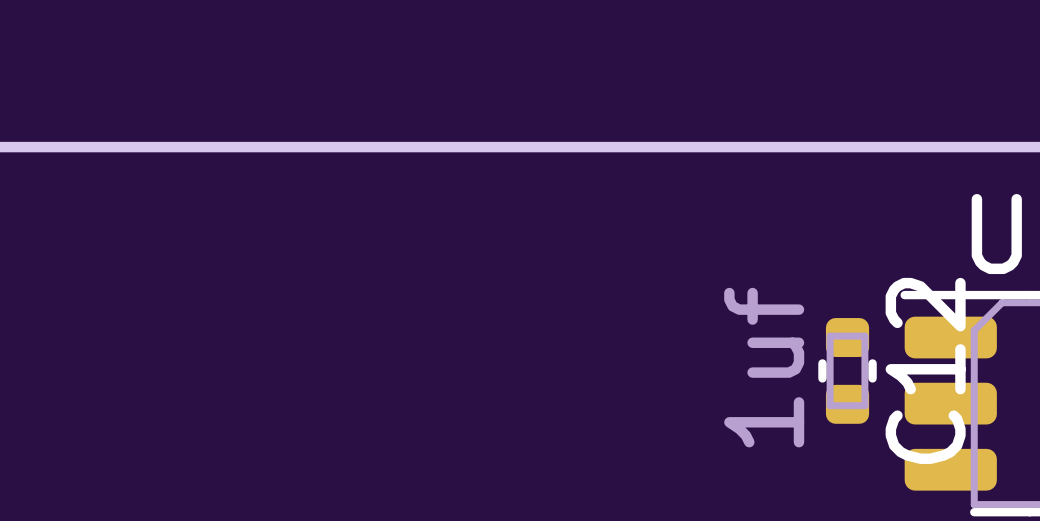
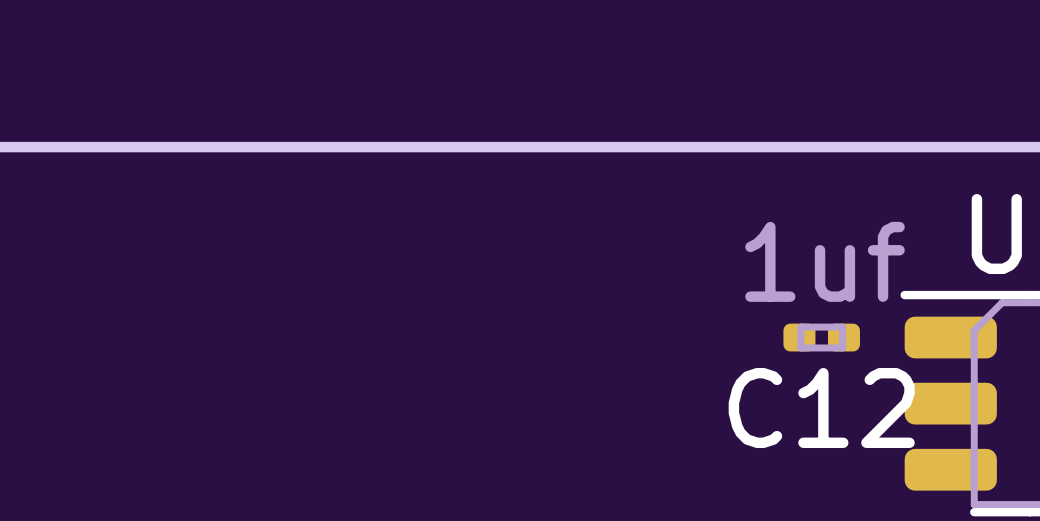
C12 footprint: [818, 318, 877, 424] -> [783, 323, 860, 352]

